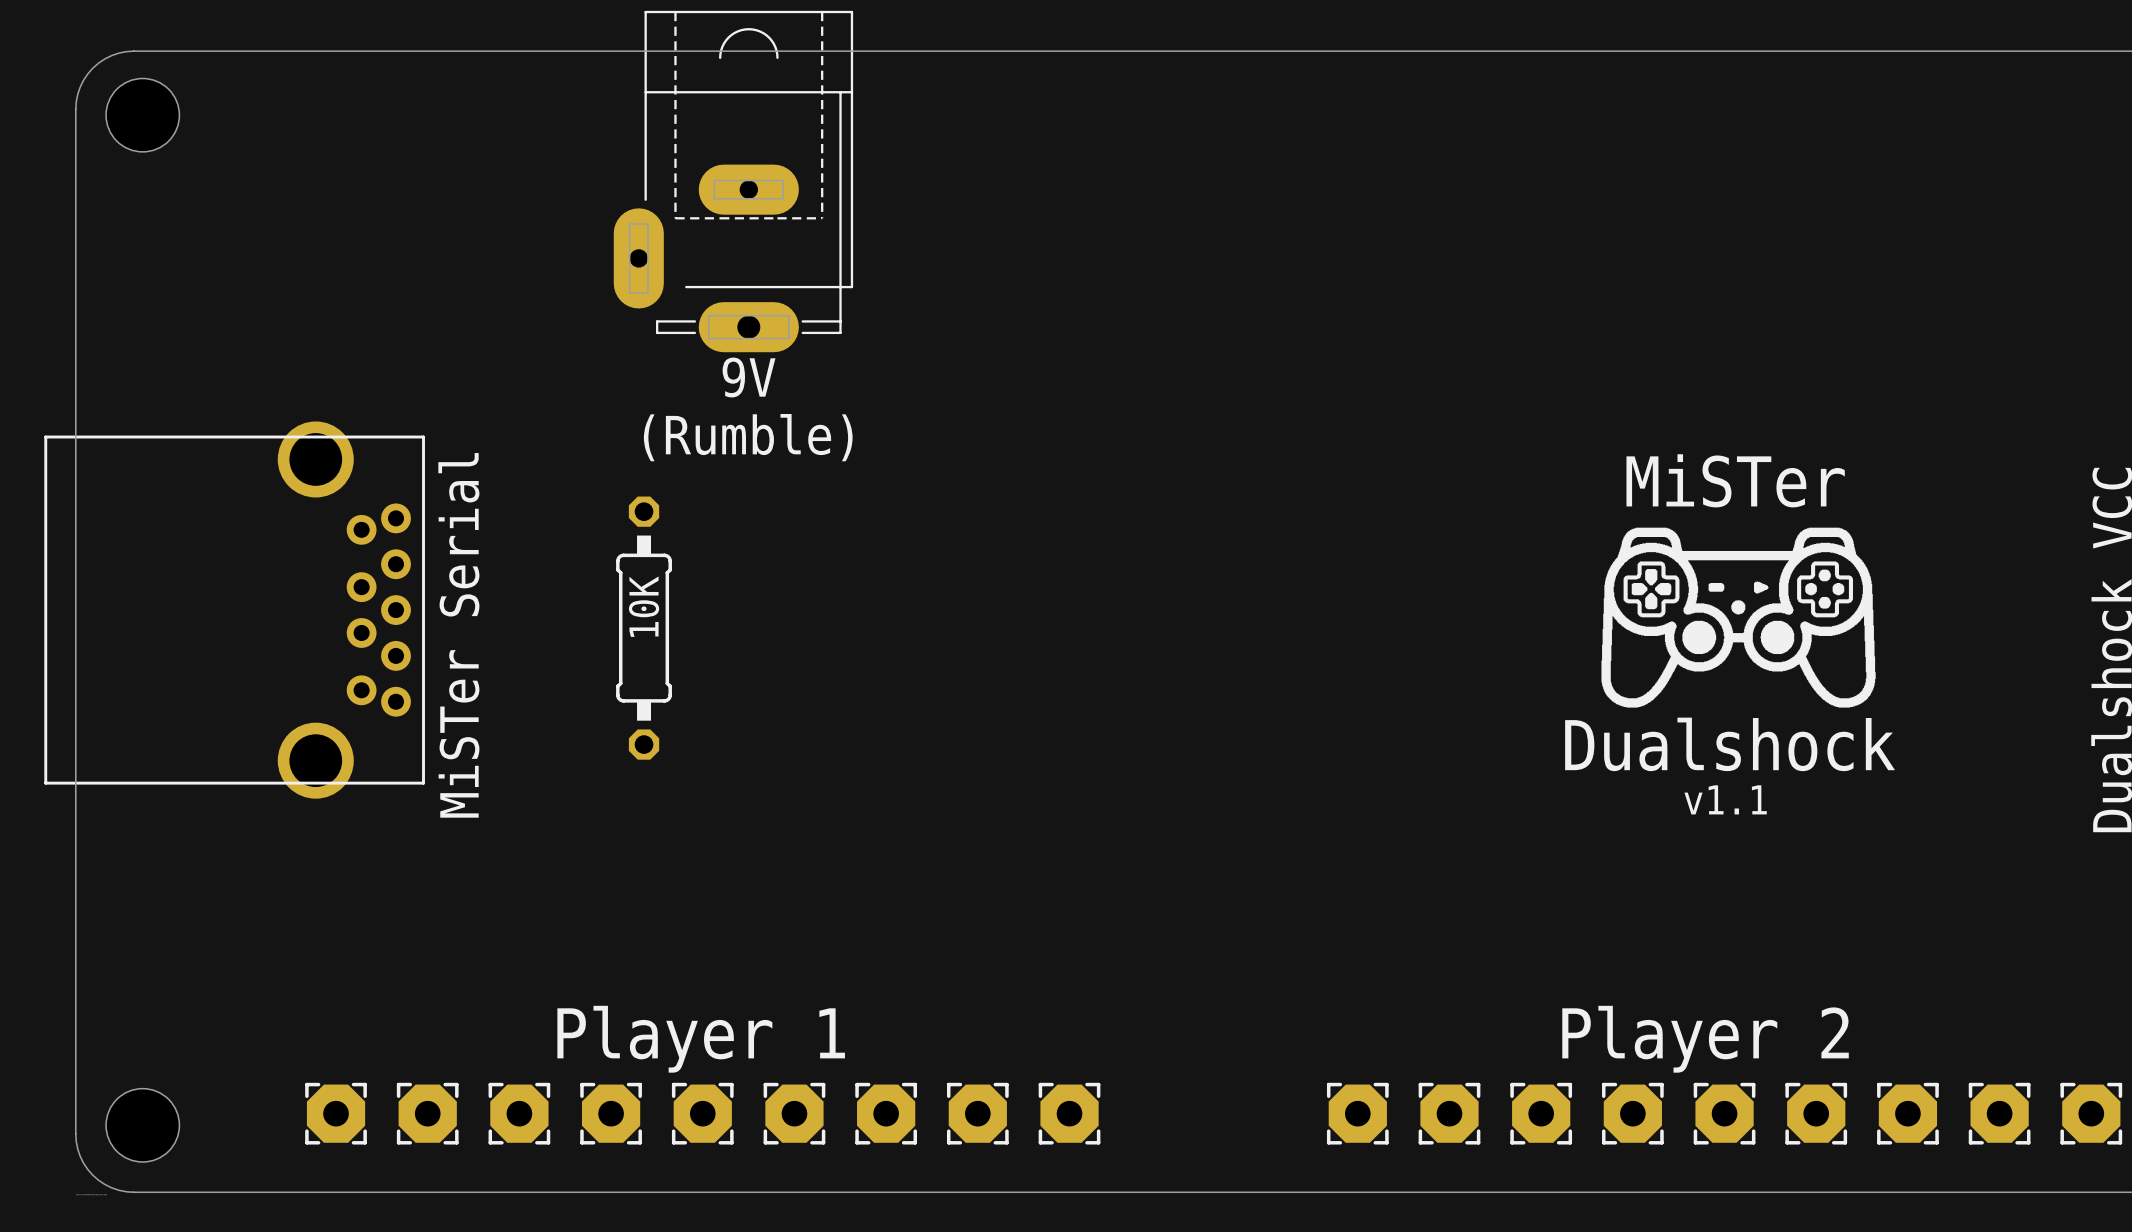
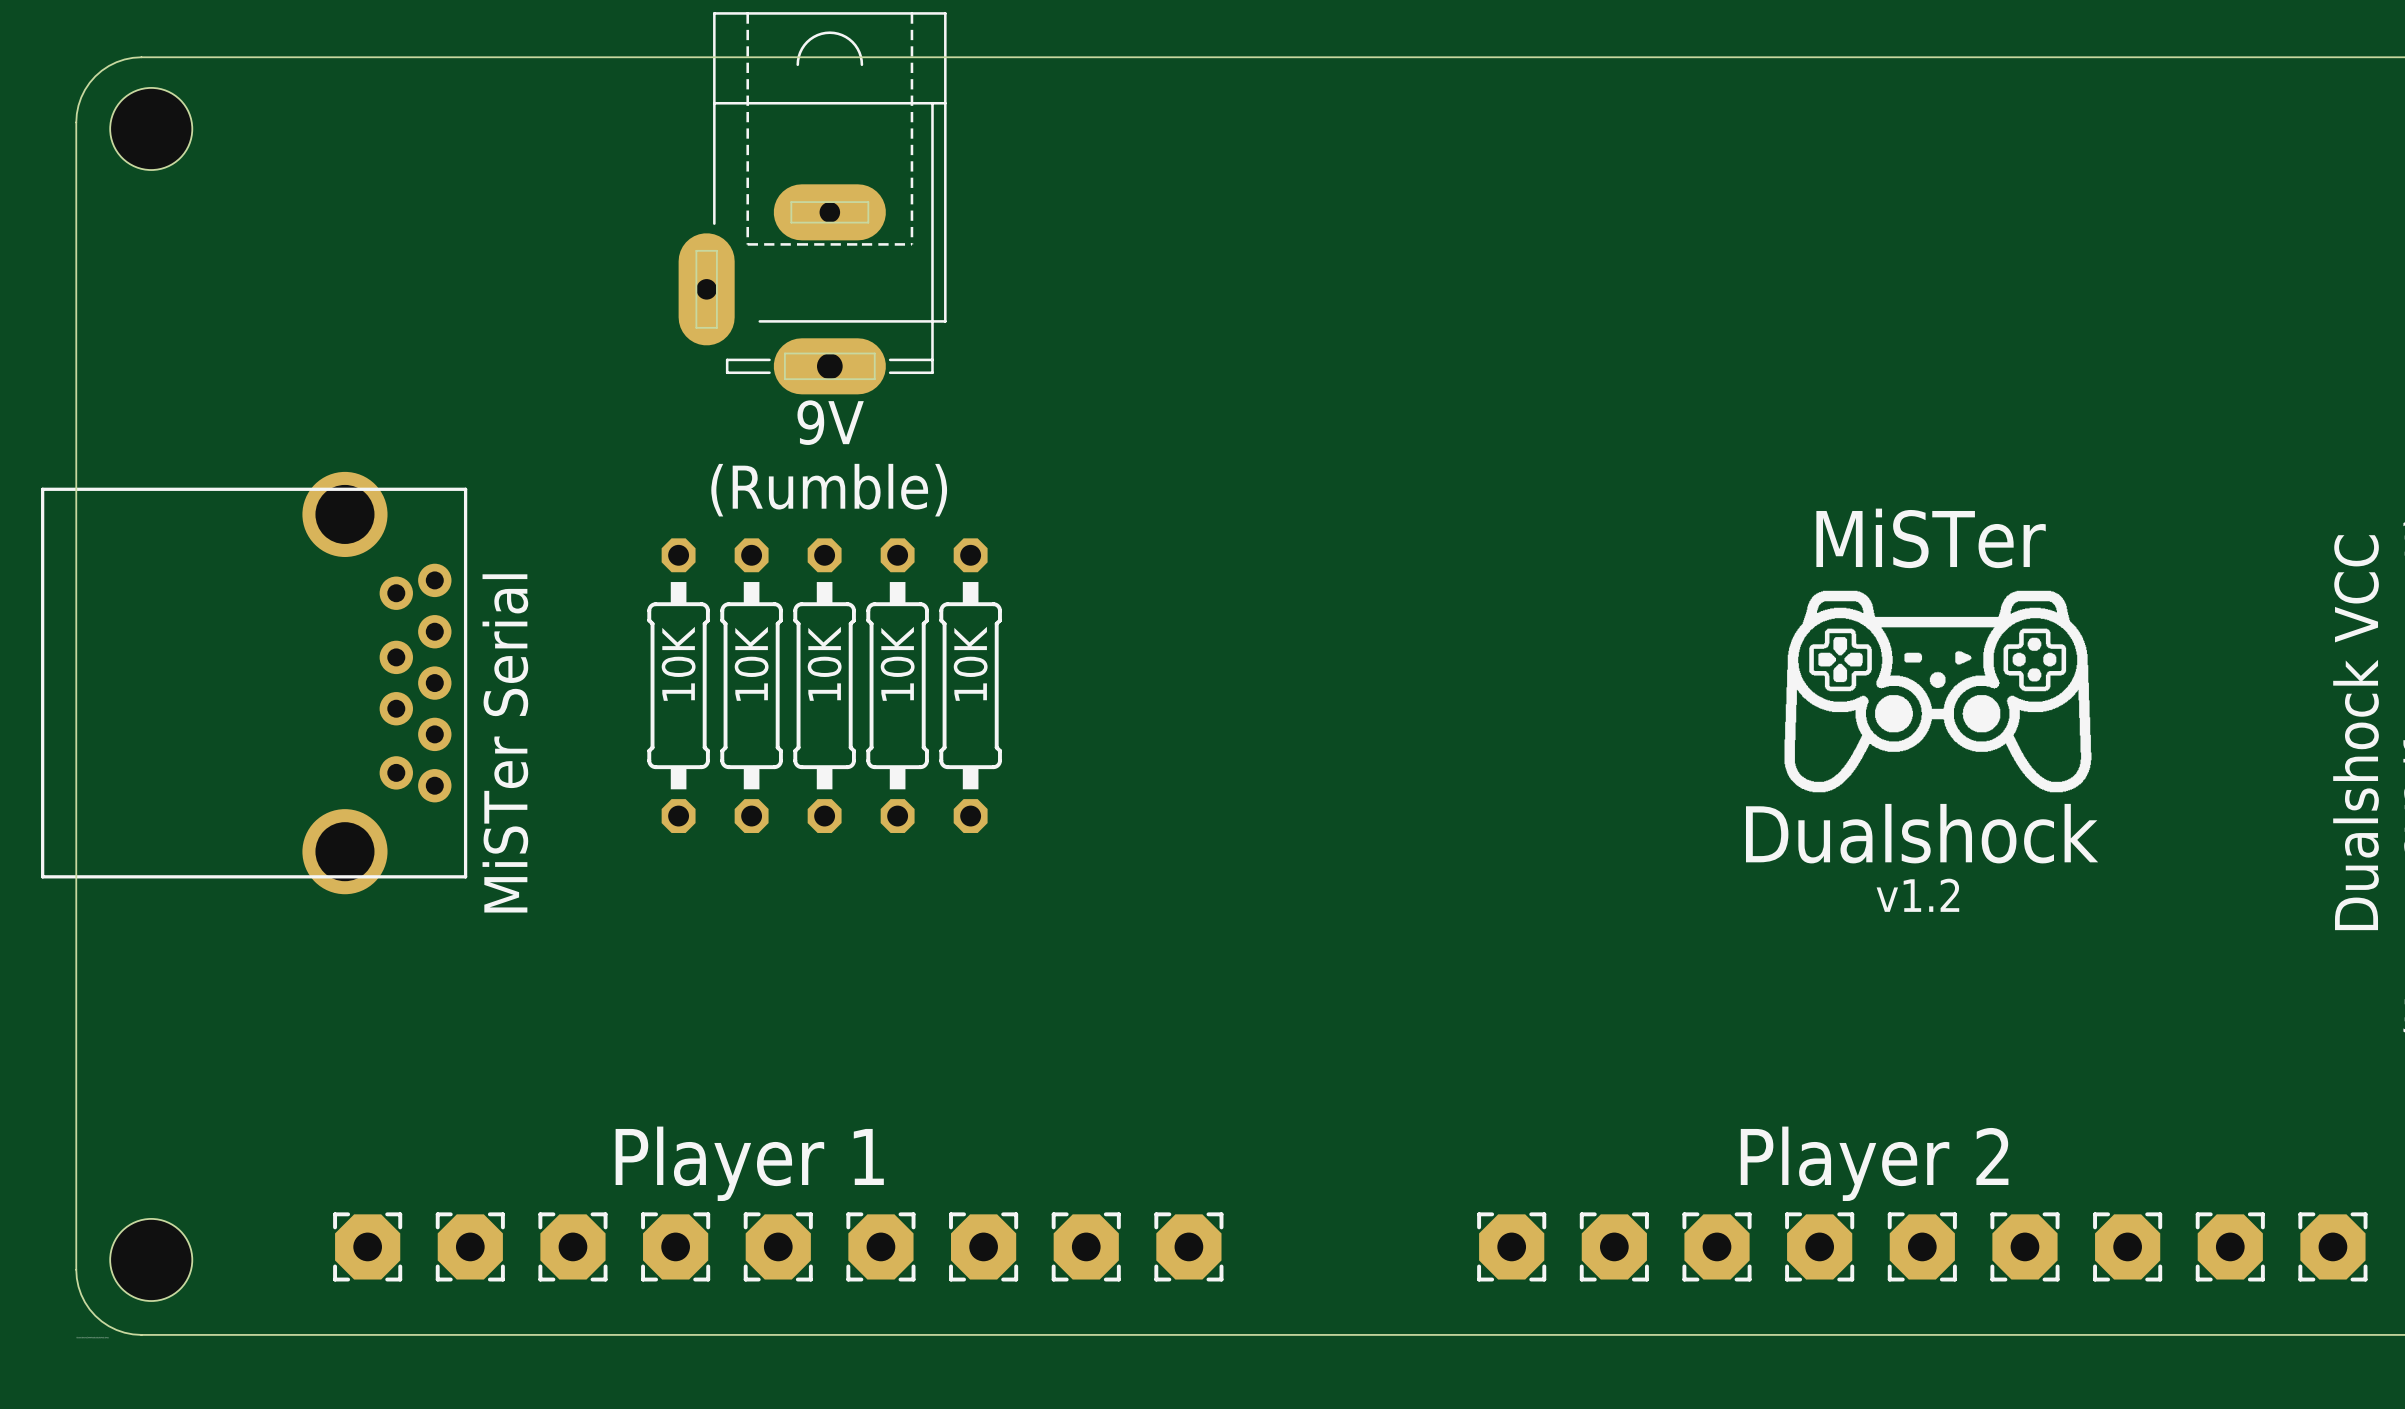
part: none -> 10K (678, 685)
part: none -> 10K (751, 685)
part: none -> 10K (824, 685)
part: none -> 10K (897, 685)
part: none -> 10K (970, 685)
part: 10K (644, 628) -> none
text: v1.1 (1725, 799) -> v1.2 (1917, 895)

